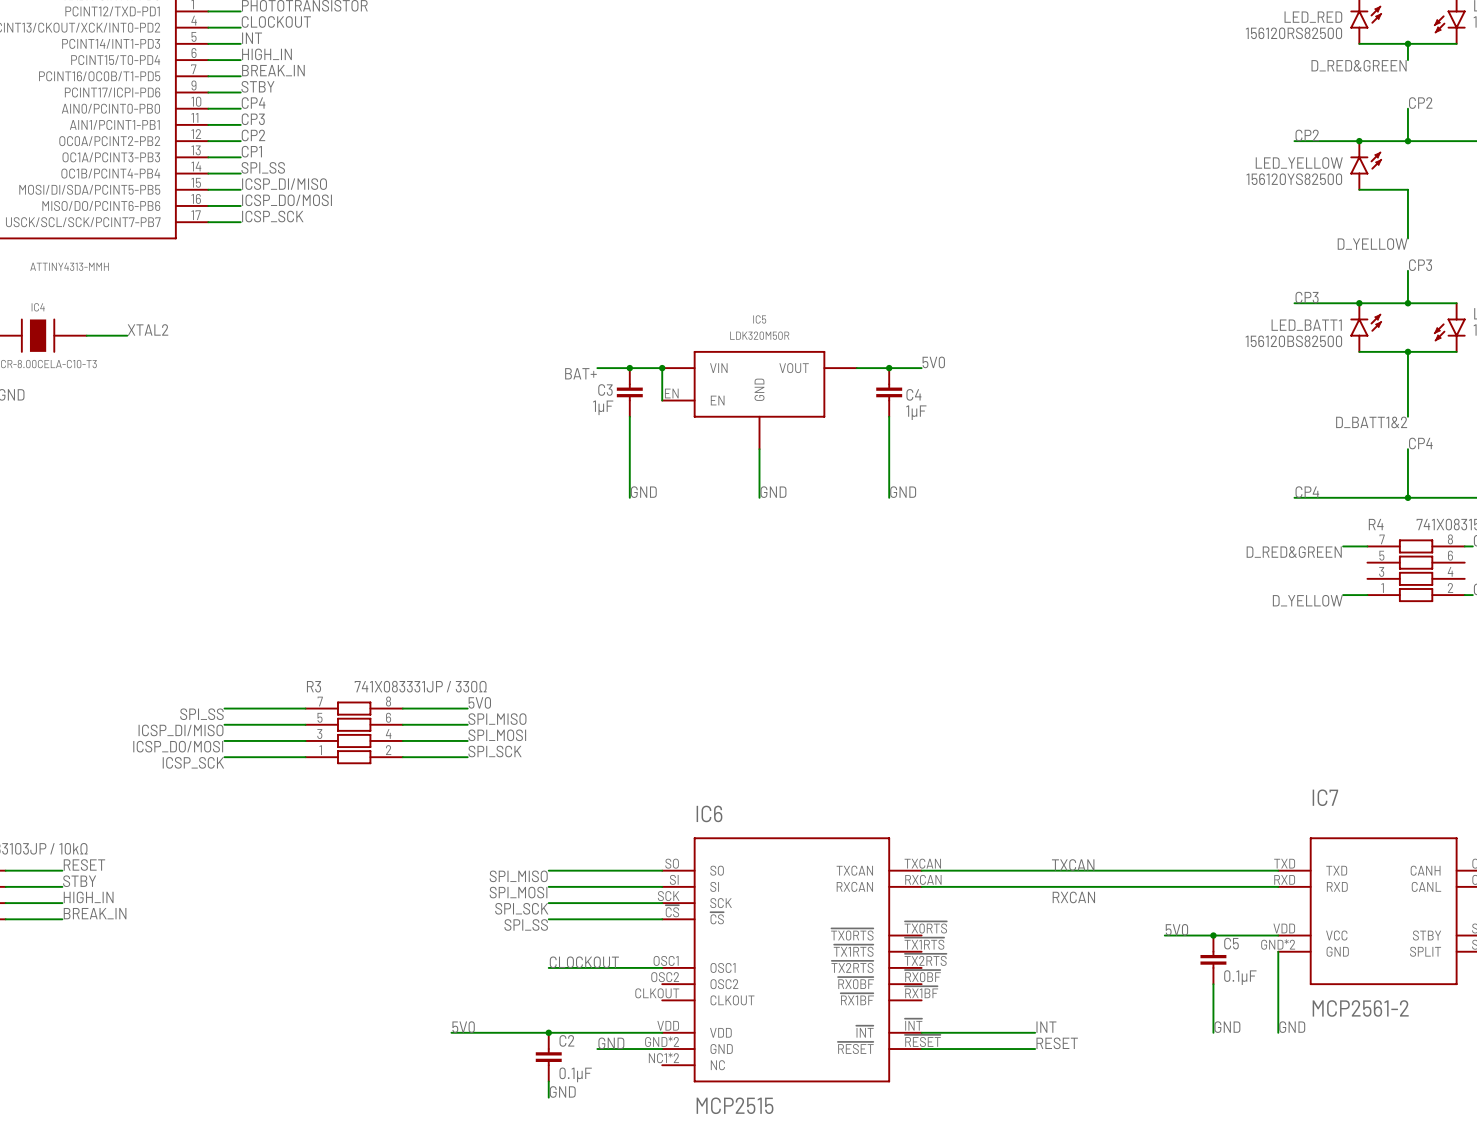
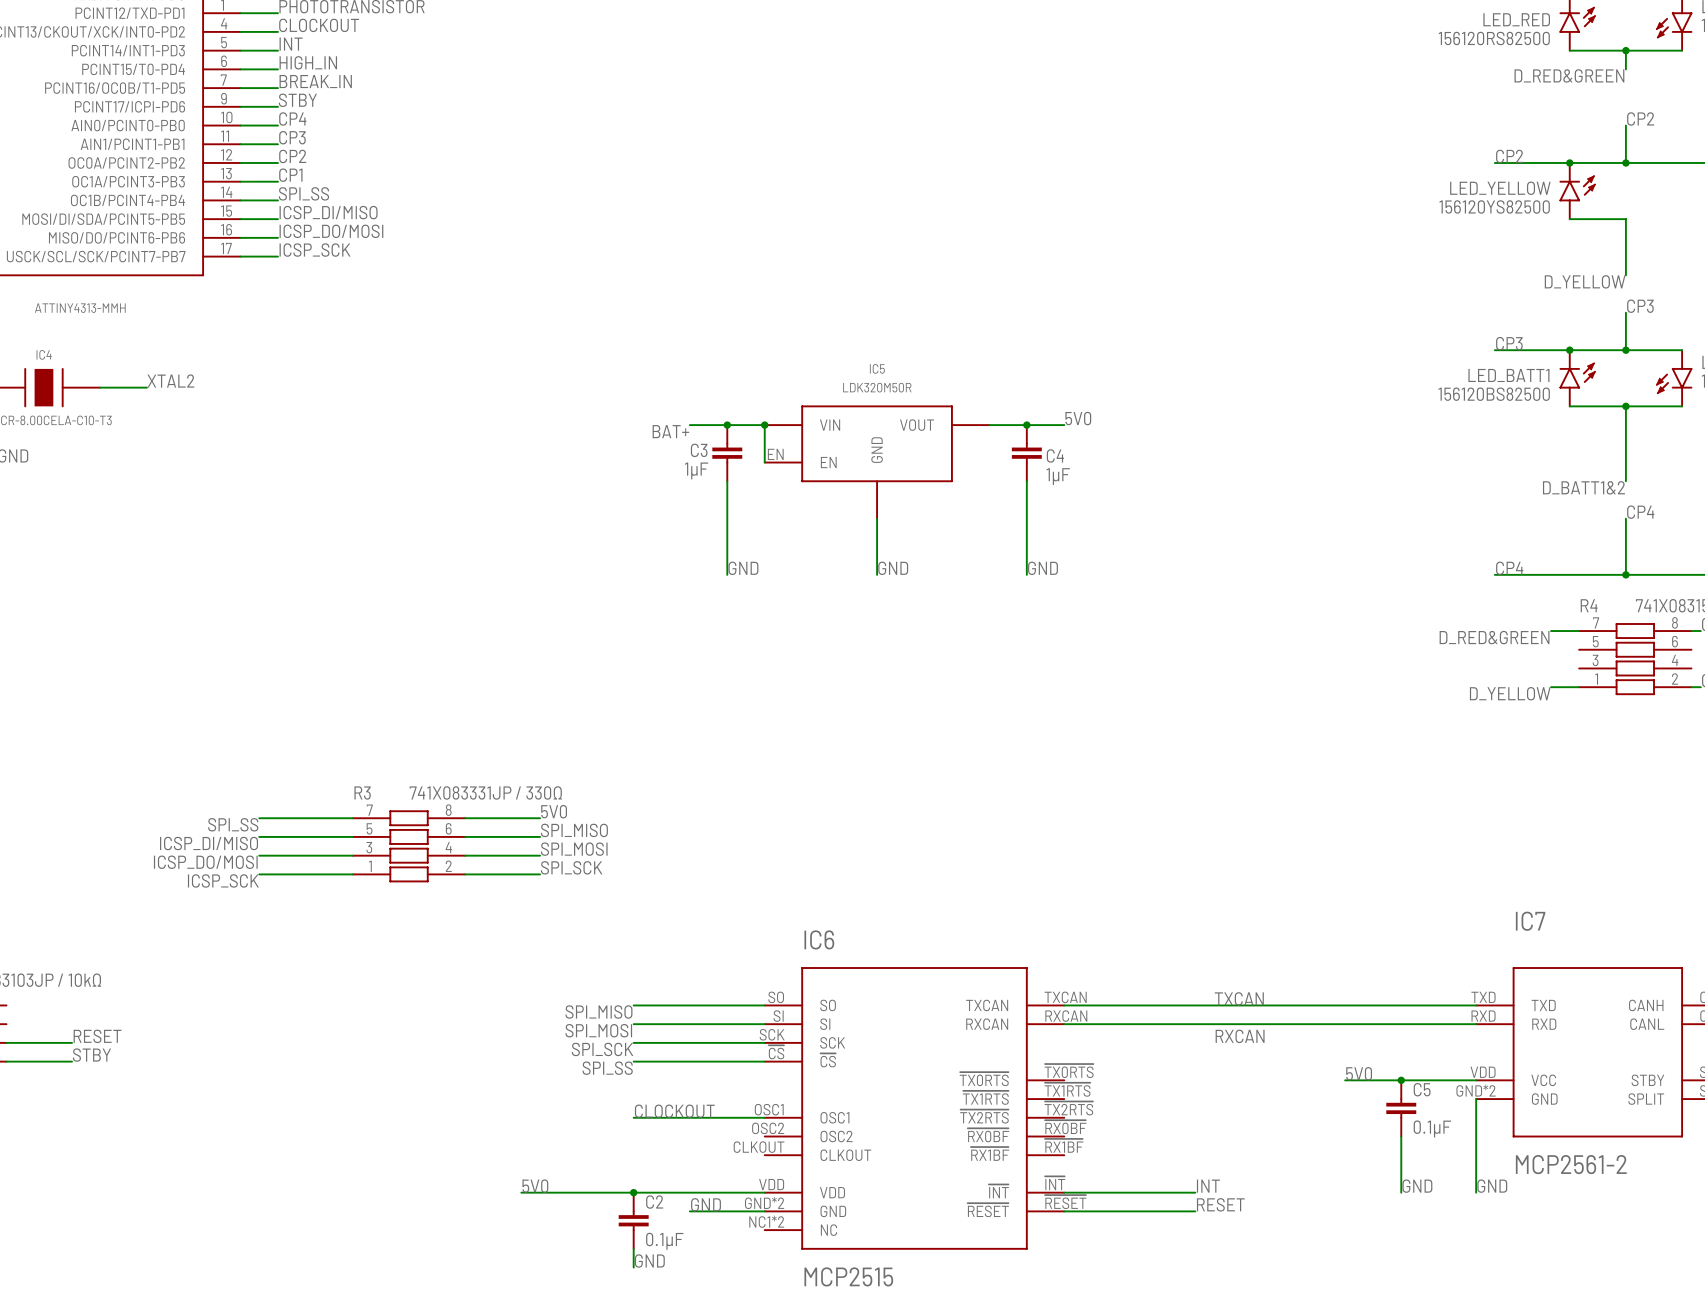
label: RESET (84, 865) -> none
wire: (5, 870) (62, 870) -> none
label: STBY (79, 881) -> none
wire: (5, 886) (62, 886) -> none
label: HIGH_IN (88, 897) -> RESET (97, 1036)
label: BREAK_IN (95, 913) -> STBY (91, 1055)

